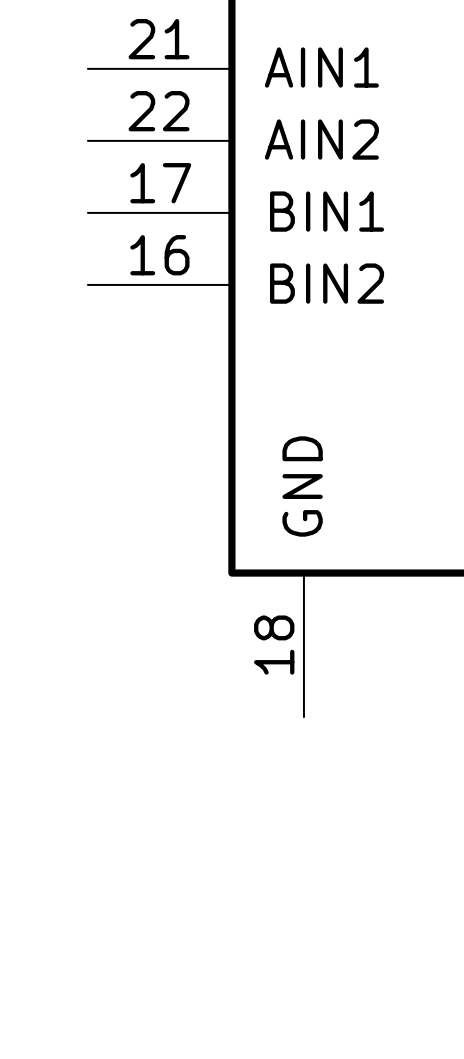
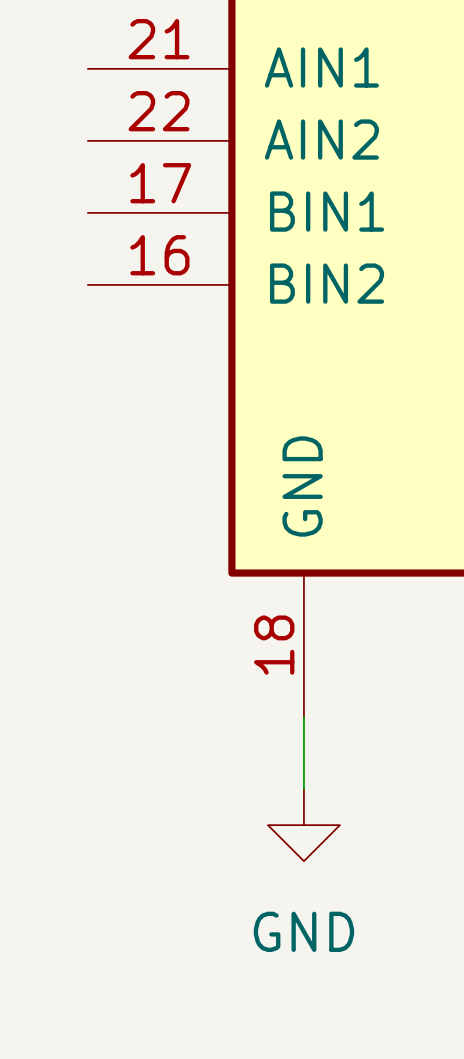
wire: none -> (303, 717) (303, 789)
power symbol: none -> GND (303, 825)

